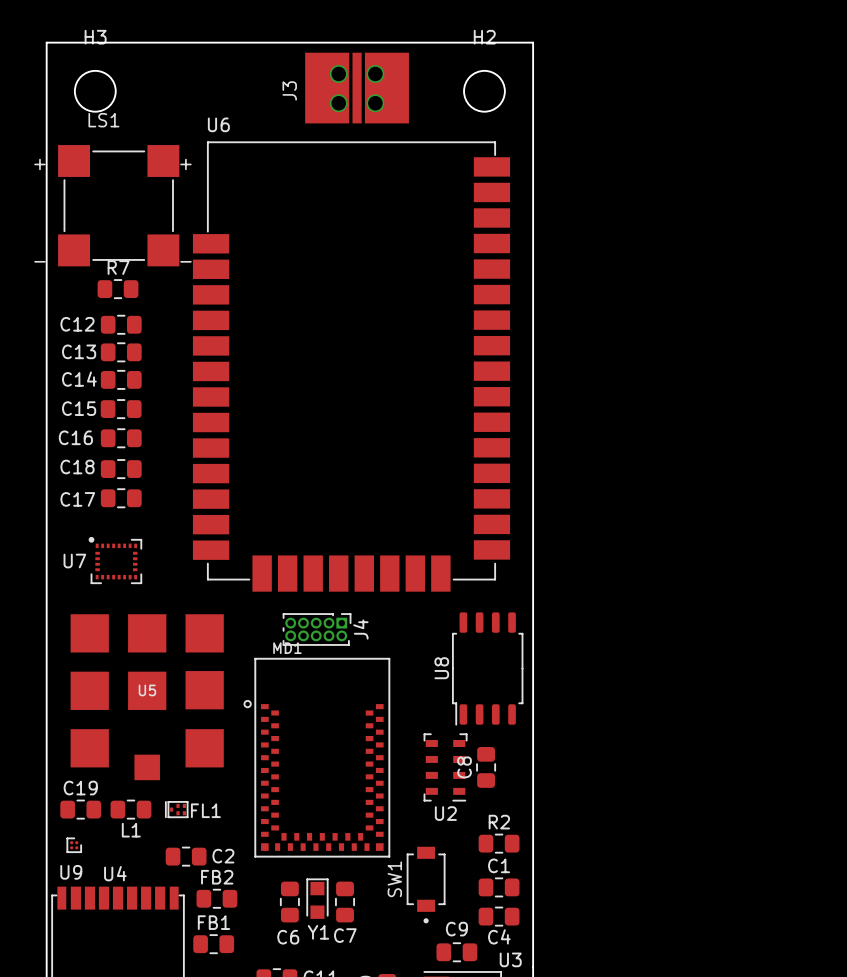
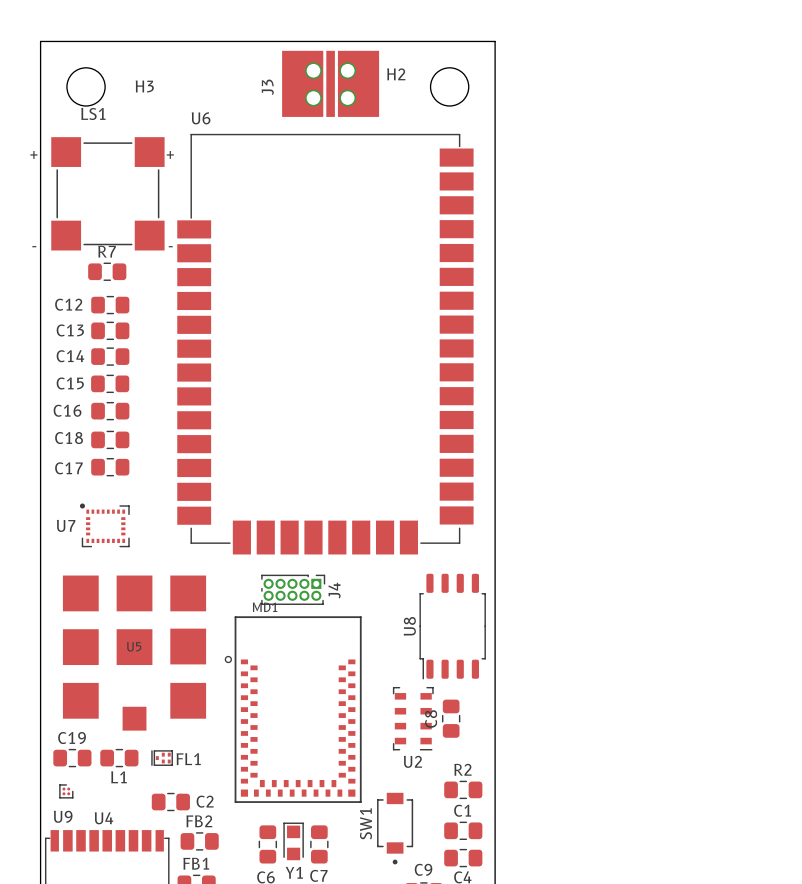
H3 name position: H3 (95, 37) -> H3 (144, 86)
H2 name position: H2 (484, 37) -> H2 (396, 74)

